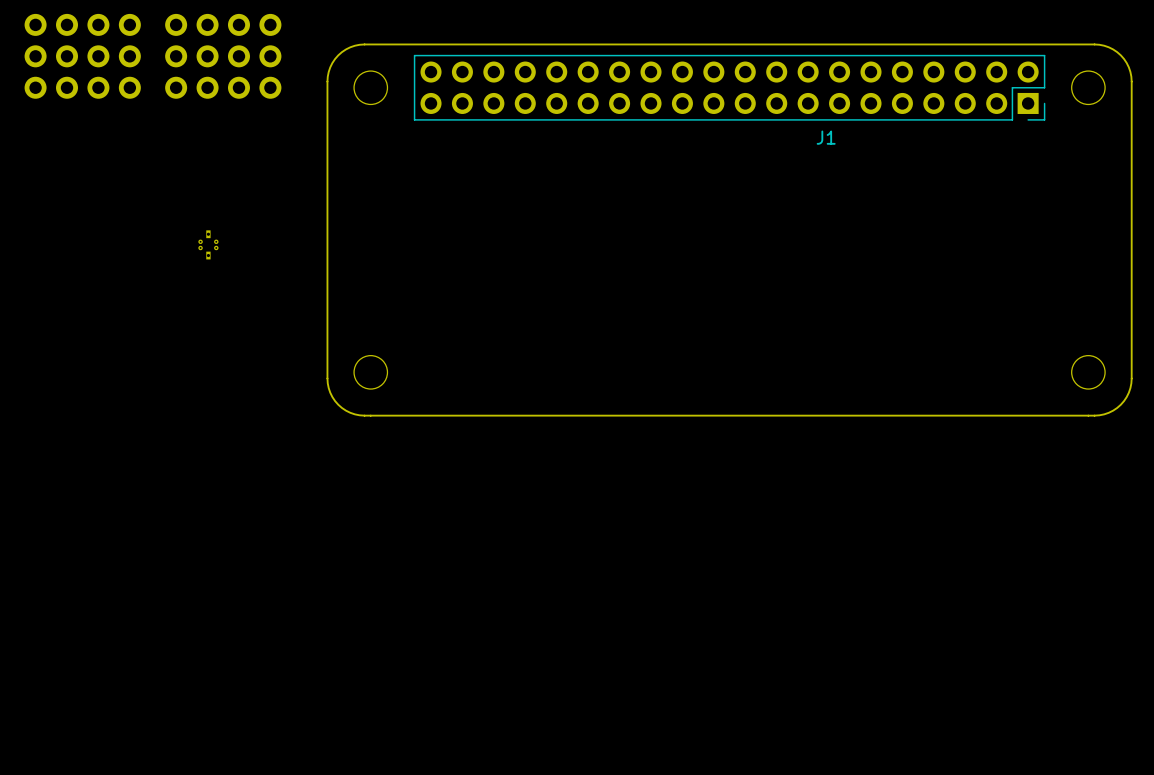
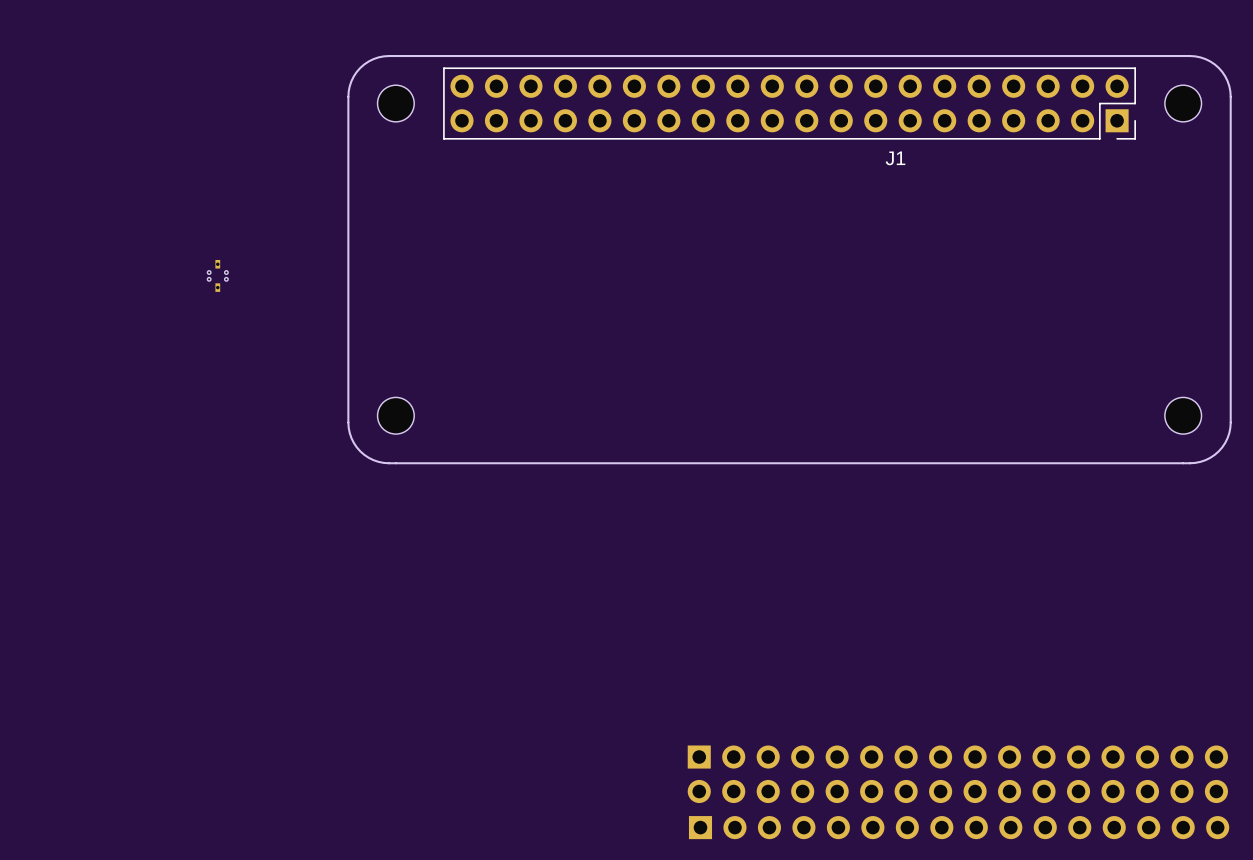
part: (82, 56) -> none
part: (223, 56) -> none
part: none -> (957, 774)
part: none -> (959, 827)

